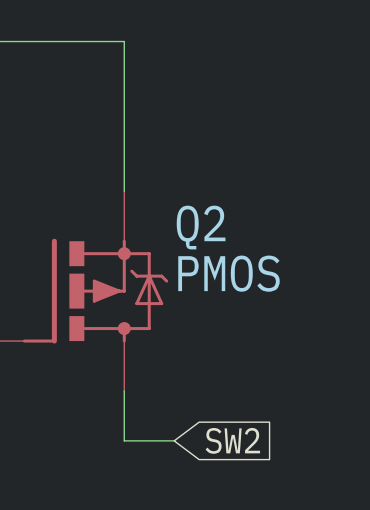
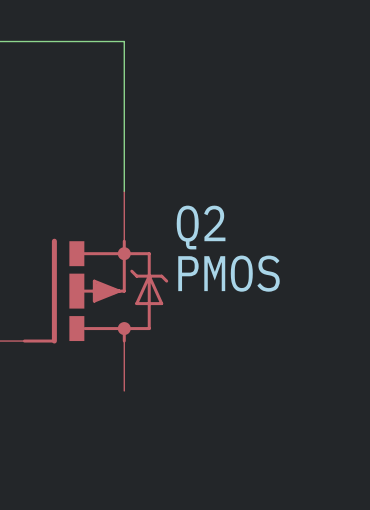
wire: (124, 390) (124, 440) (174, 440) -> none
global label: SW2 (232, 440) -> none

